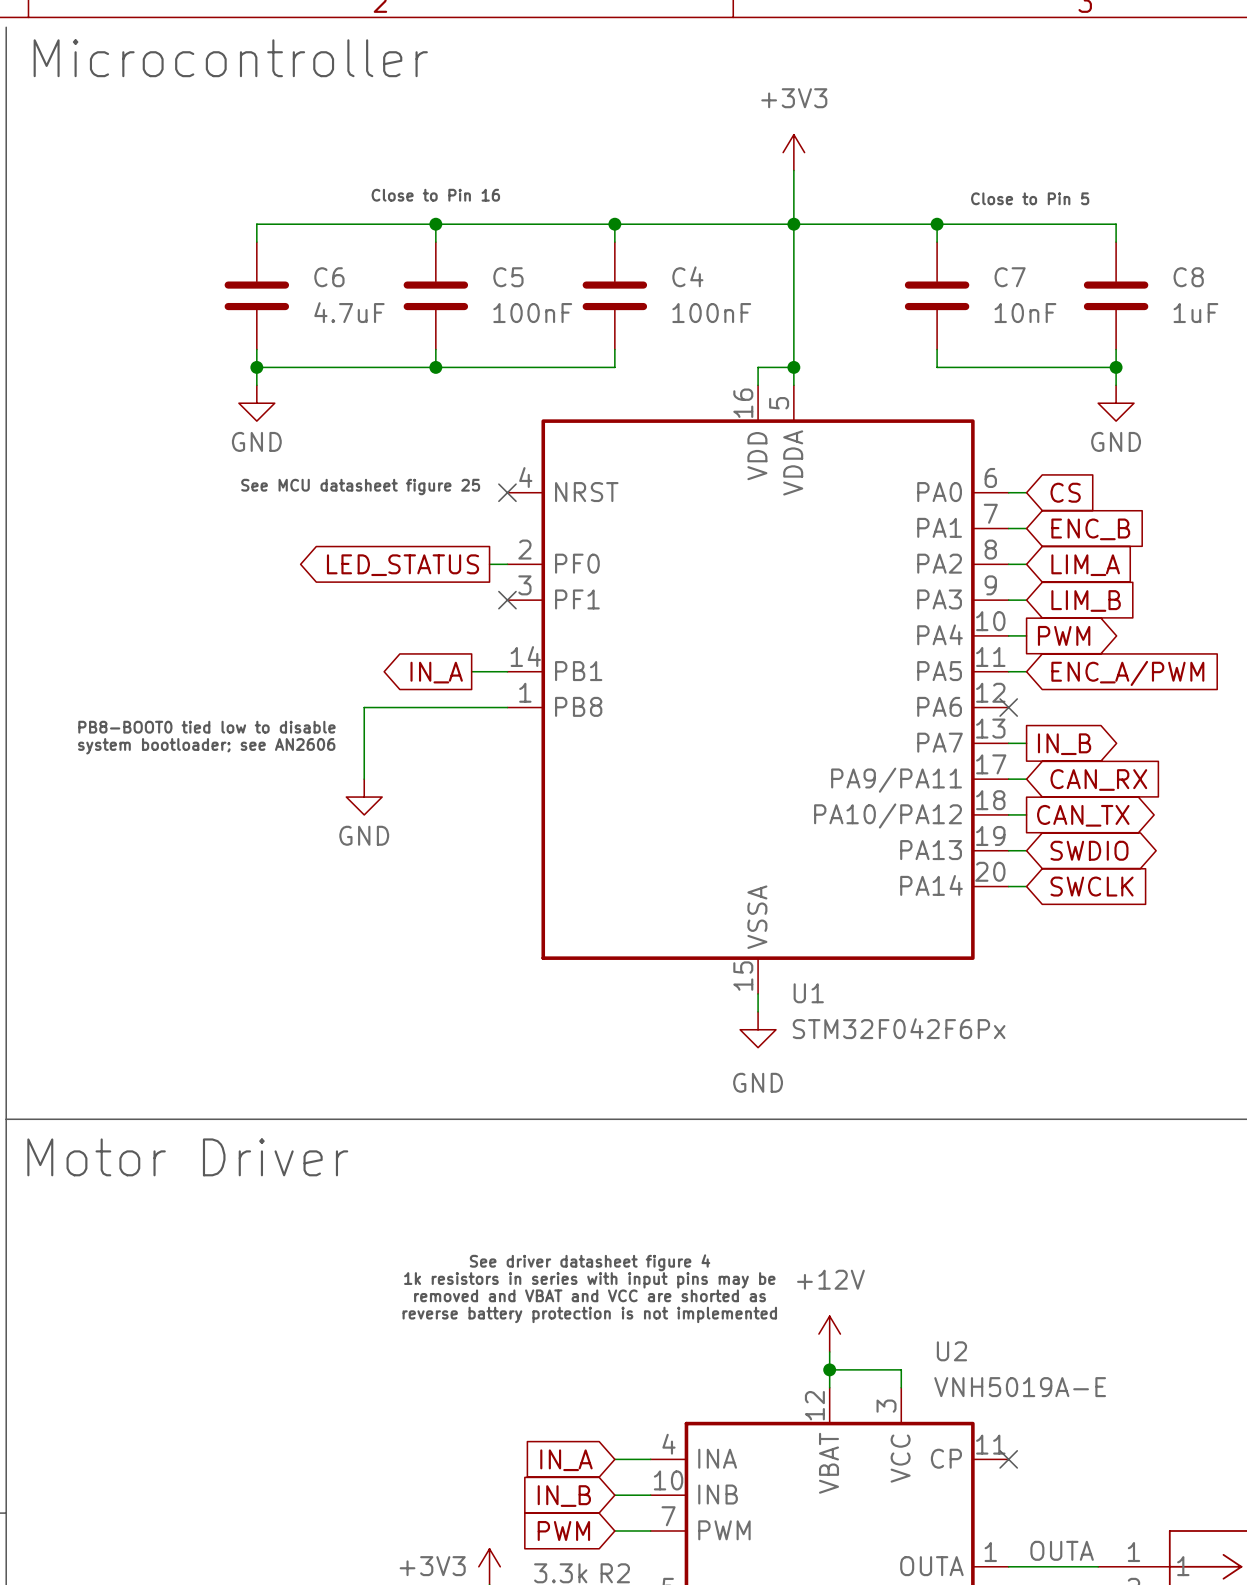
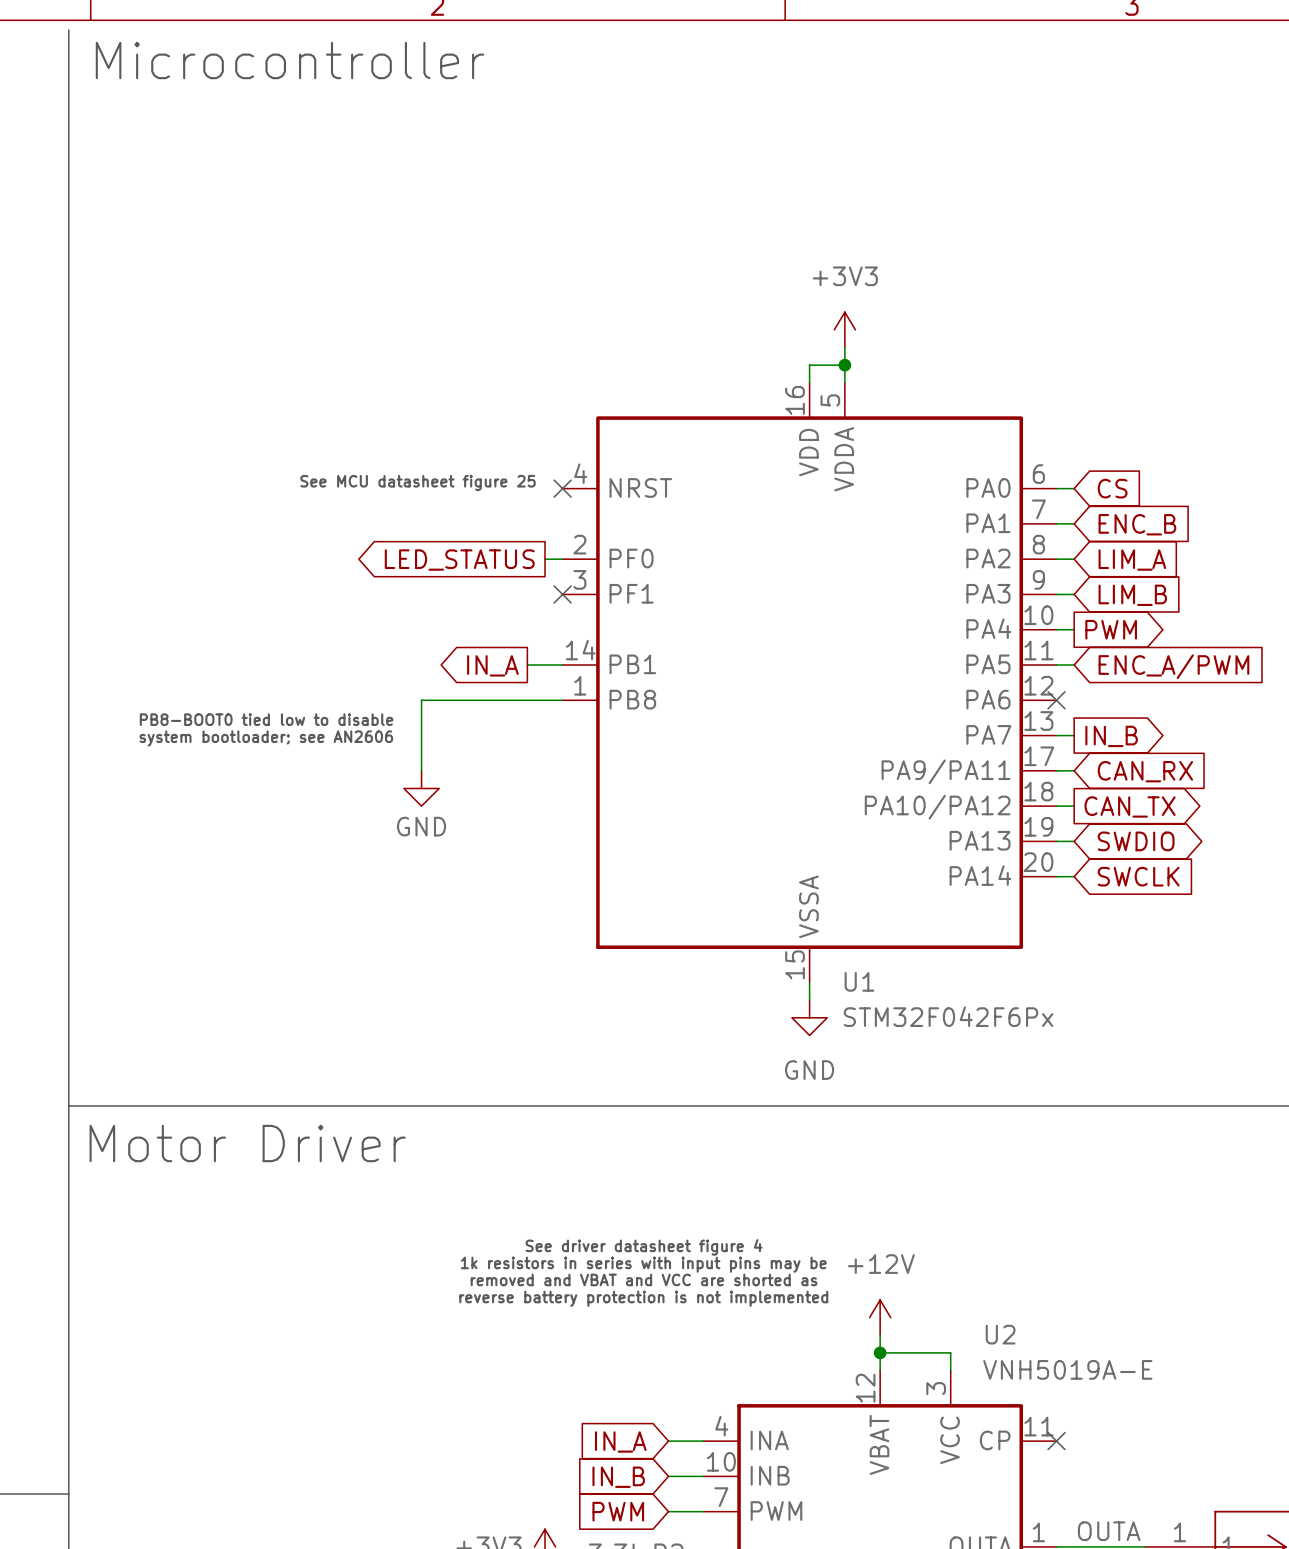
power symbol position: +3V3 (793, 152) -> +3V3 (844, 329)
wire: (793, 170) (793, 349) -> none
text: Close to Pin 16 (435, 195) -> none
text: Close to Pin 5 (1030, 198) -> none
wire: (435, 224) (435, 242) -> none
junction: (435, 224) -> none
wire: (614, 224) (614, 242) -> none
junction: (614, 224) -> none
junction: (793, 224) -> none
wire: (937, 224) (937, 242) -> none
junction: (937, 224) -> none
wire: (256, 242) (256, 224) (1116, 224) (1116, 242) -> none
C6: 4.7uF (256, 295) -> none
C5: 100nF (435, 295) -> none
C4: 100nF (614, 295) -> none
C7: 10nF (937, 295) -> none
C8: 1uF (1116, 295) -> none
wire: (256, 349) (256, 385) -> none
wire: (435, 349) (435, 367) -> none
wire: (614, 349) (614, 367) (256, 367) -> none
wire: (937, 349) (937, 367) (1116, 367) -> none
wire: (1116, 349) (1116, 385) -> none
junction: (256, 367) -> none
junction: (435, 367) -> none
junction: (1116, 367) -> none
power symbol: GND (256, 403) -> none
power symbol: GND (1116, 403) -> none

